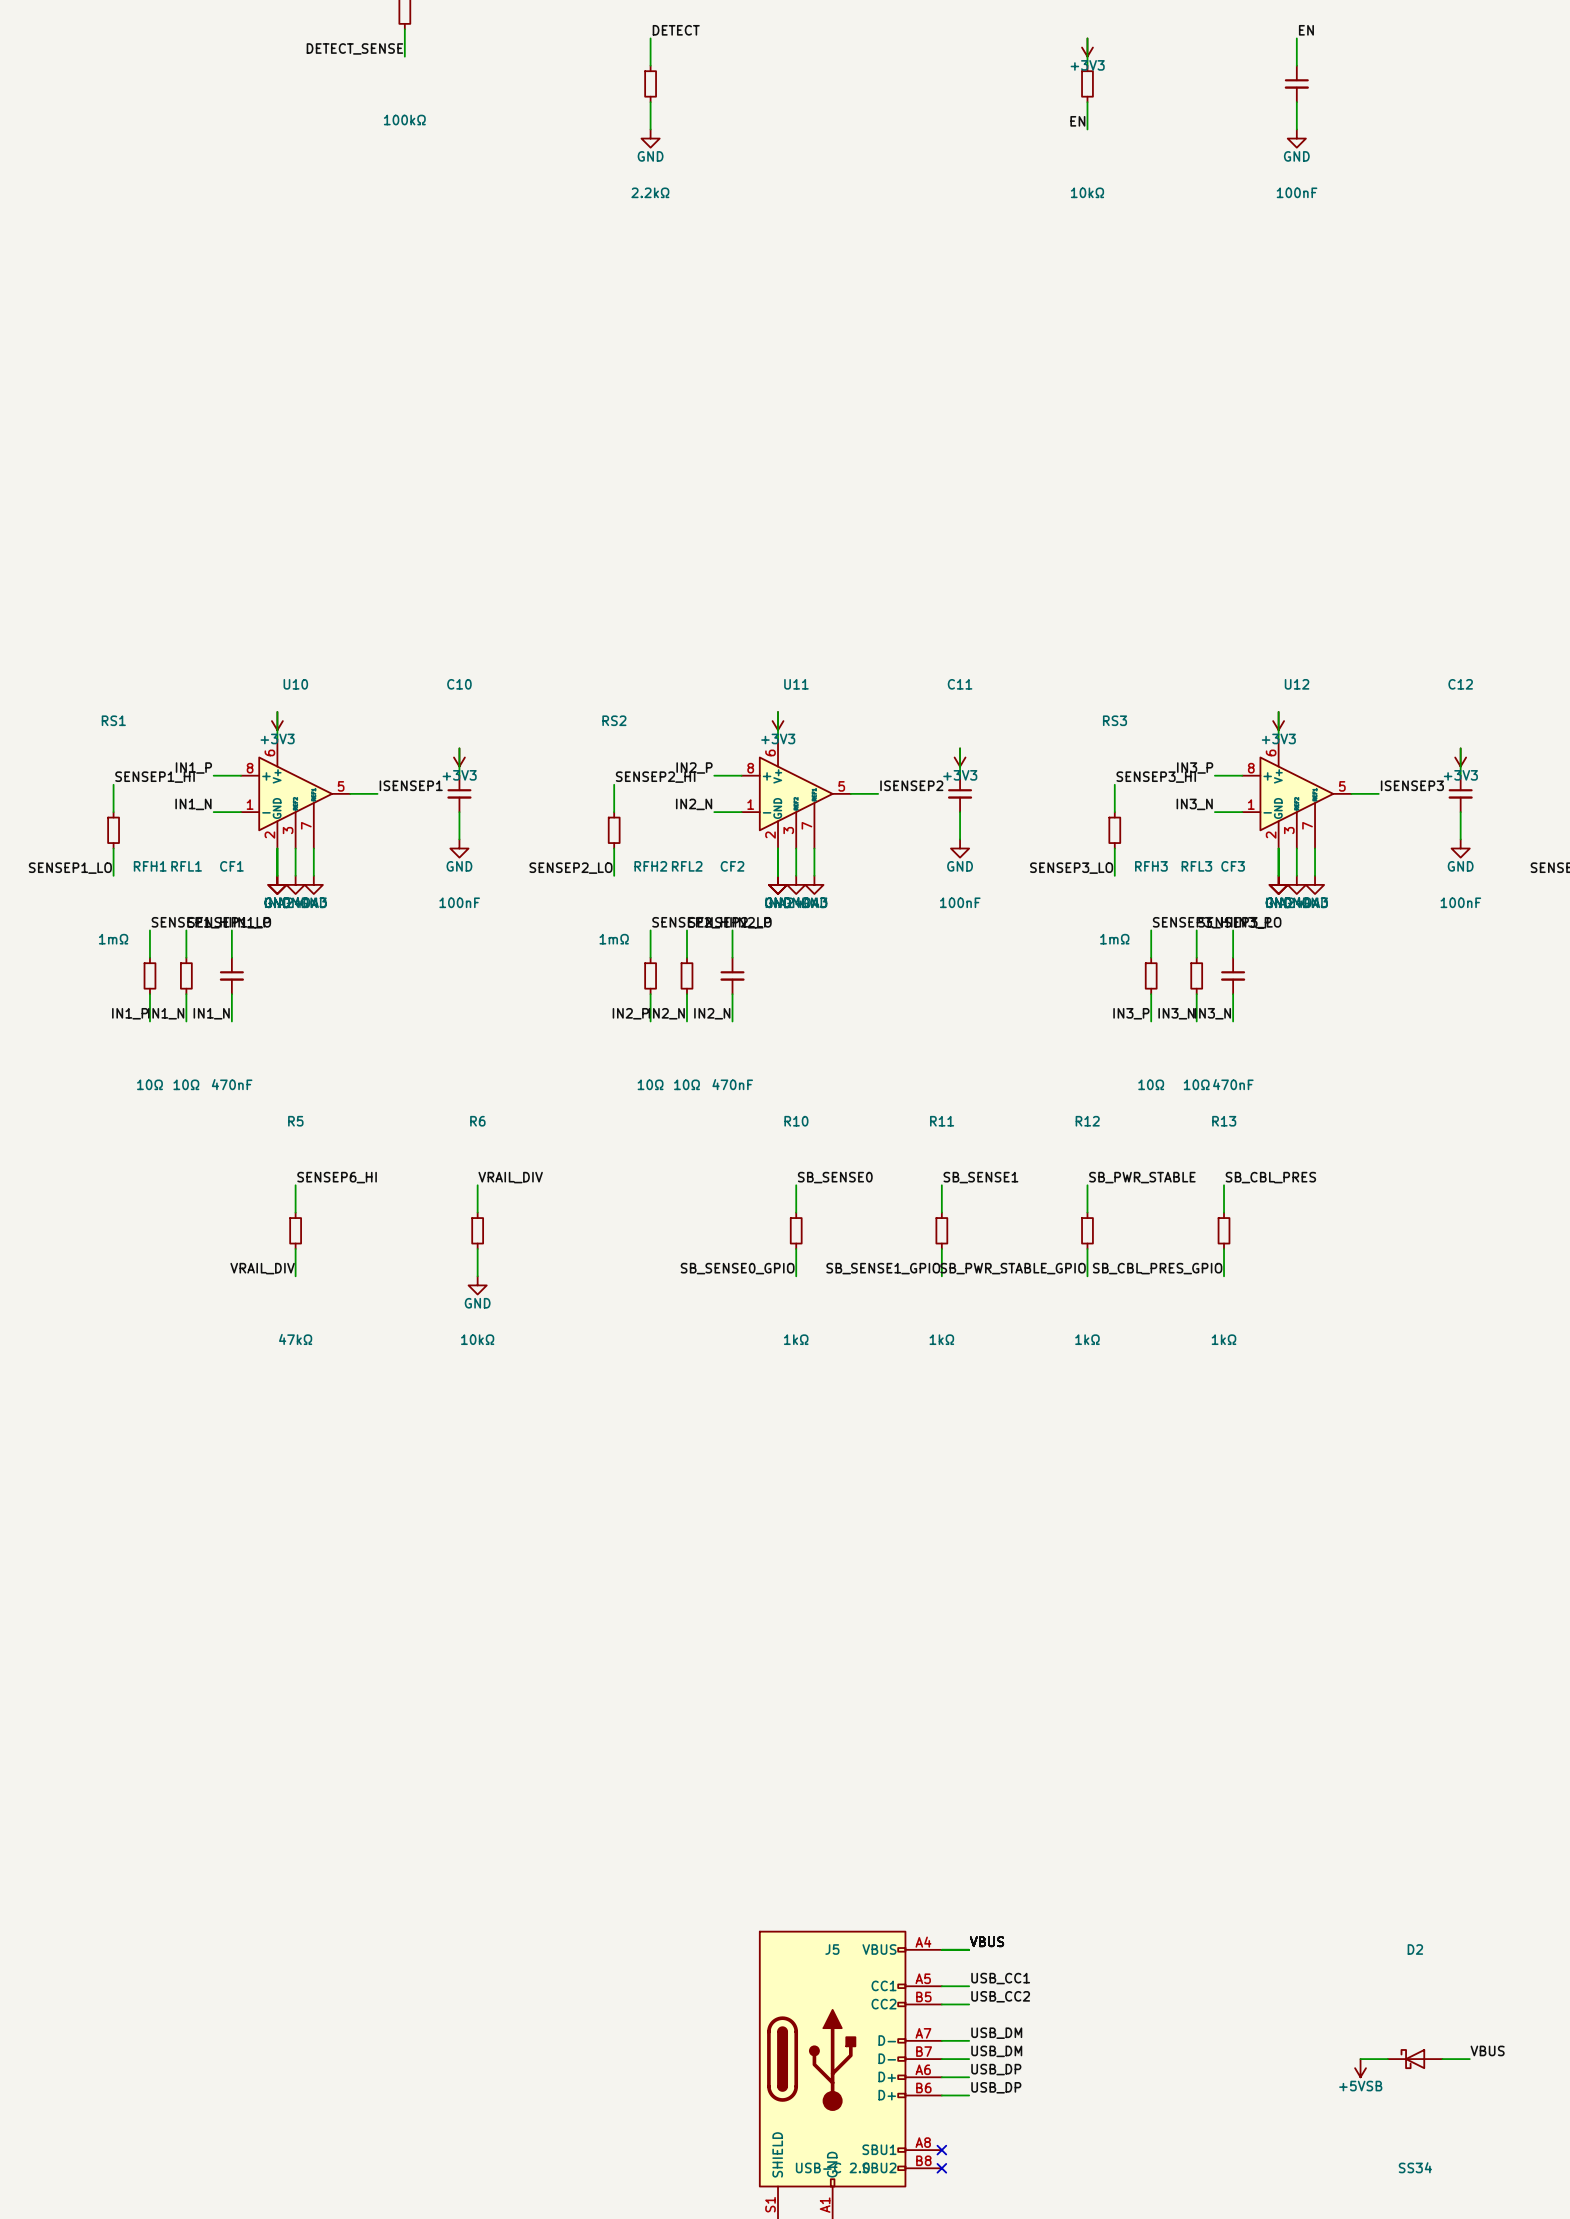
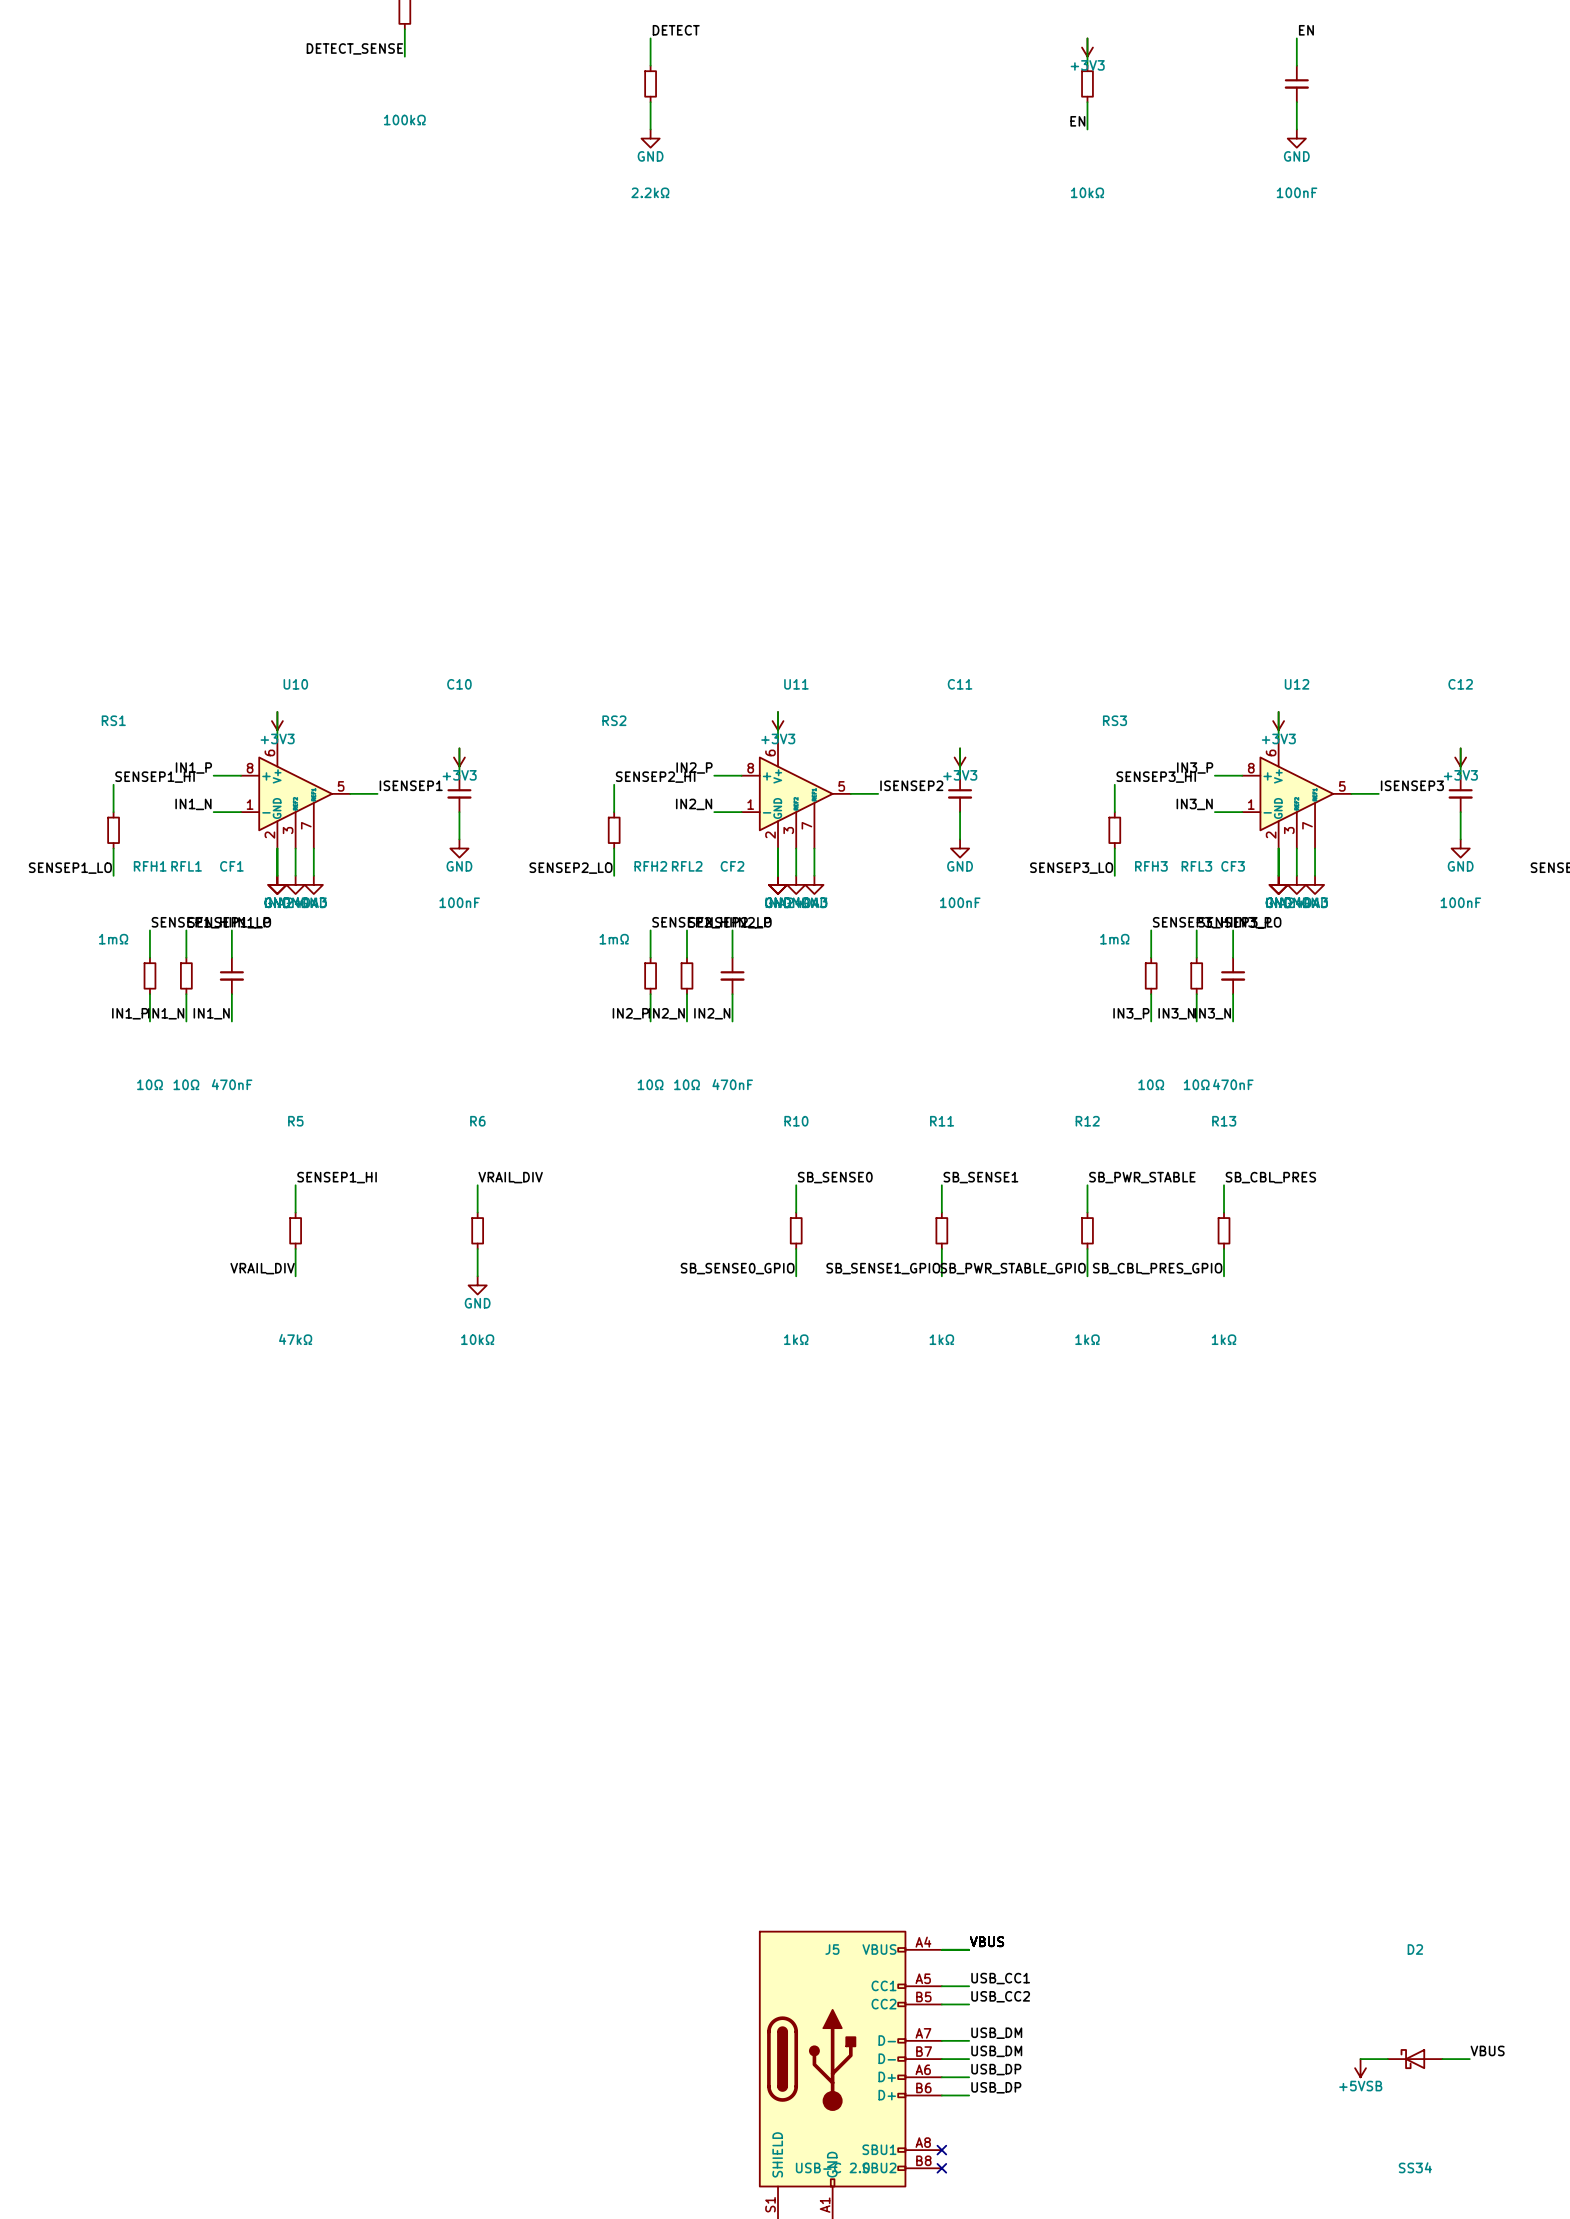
label: SENSEP6_HI (337, 1177) -> SENSEP1_HI (337, 1177)

